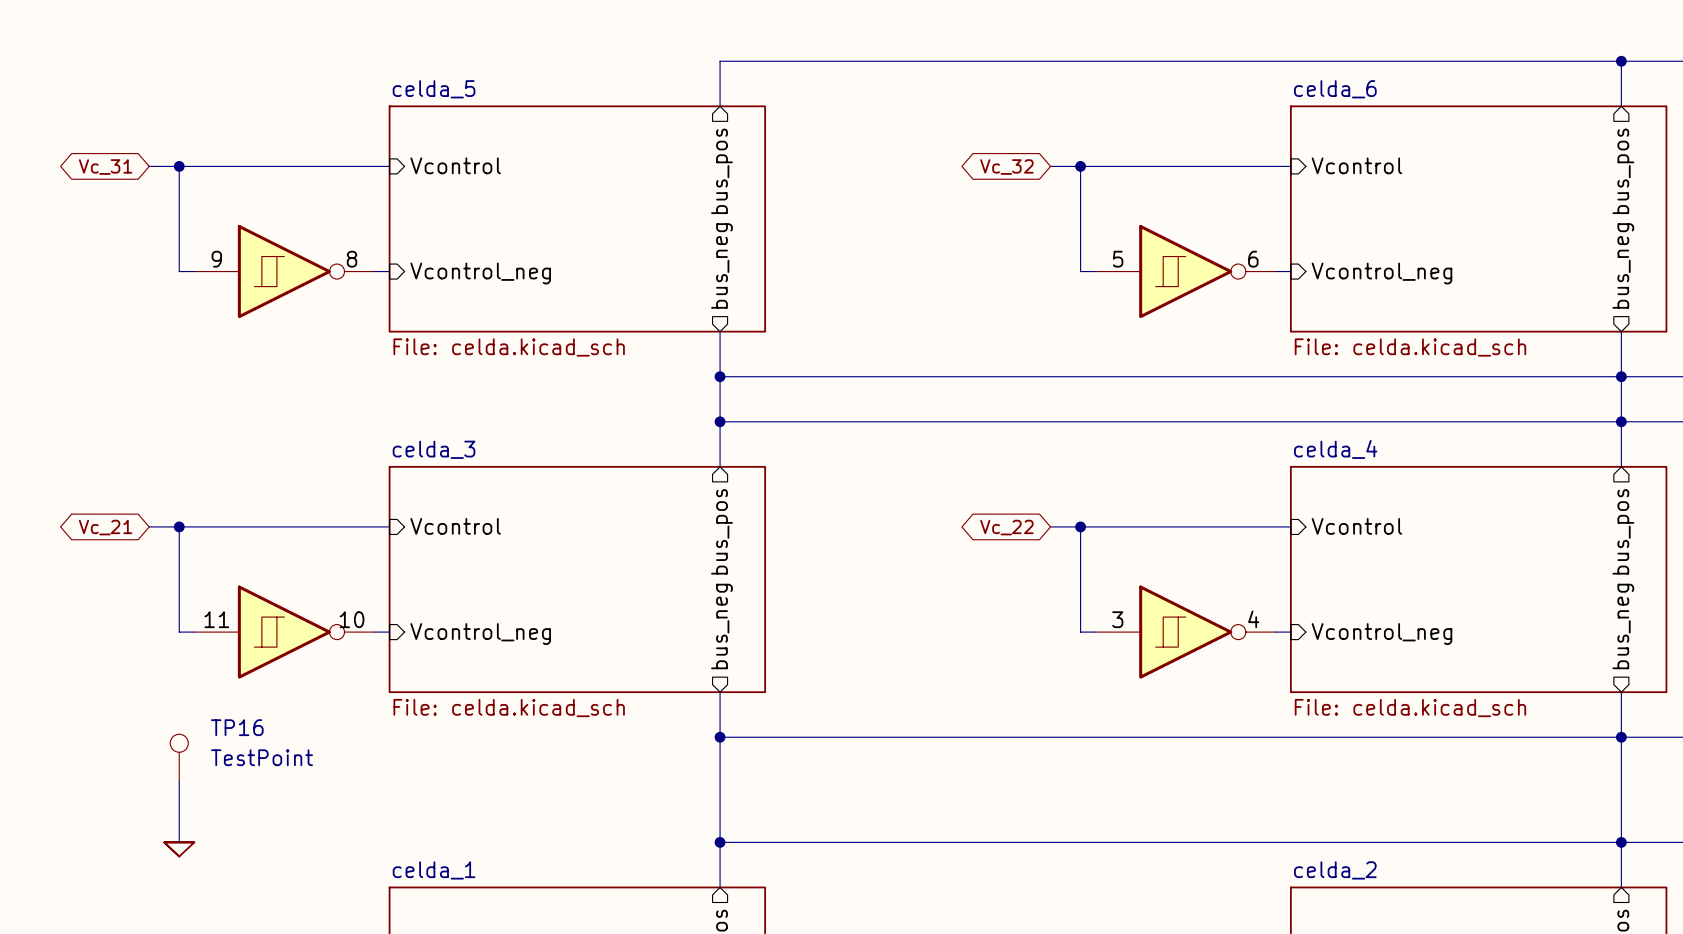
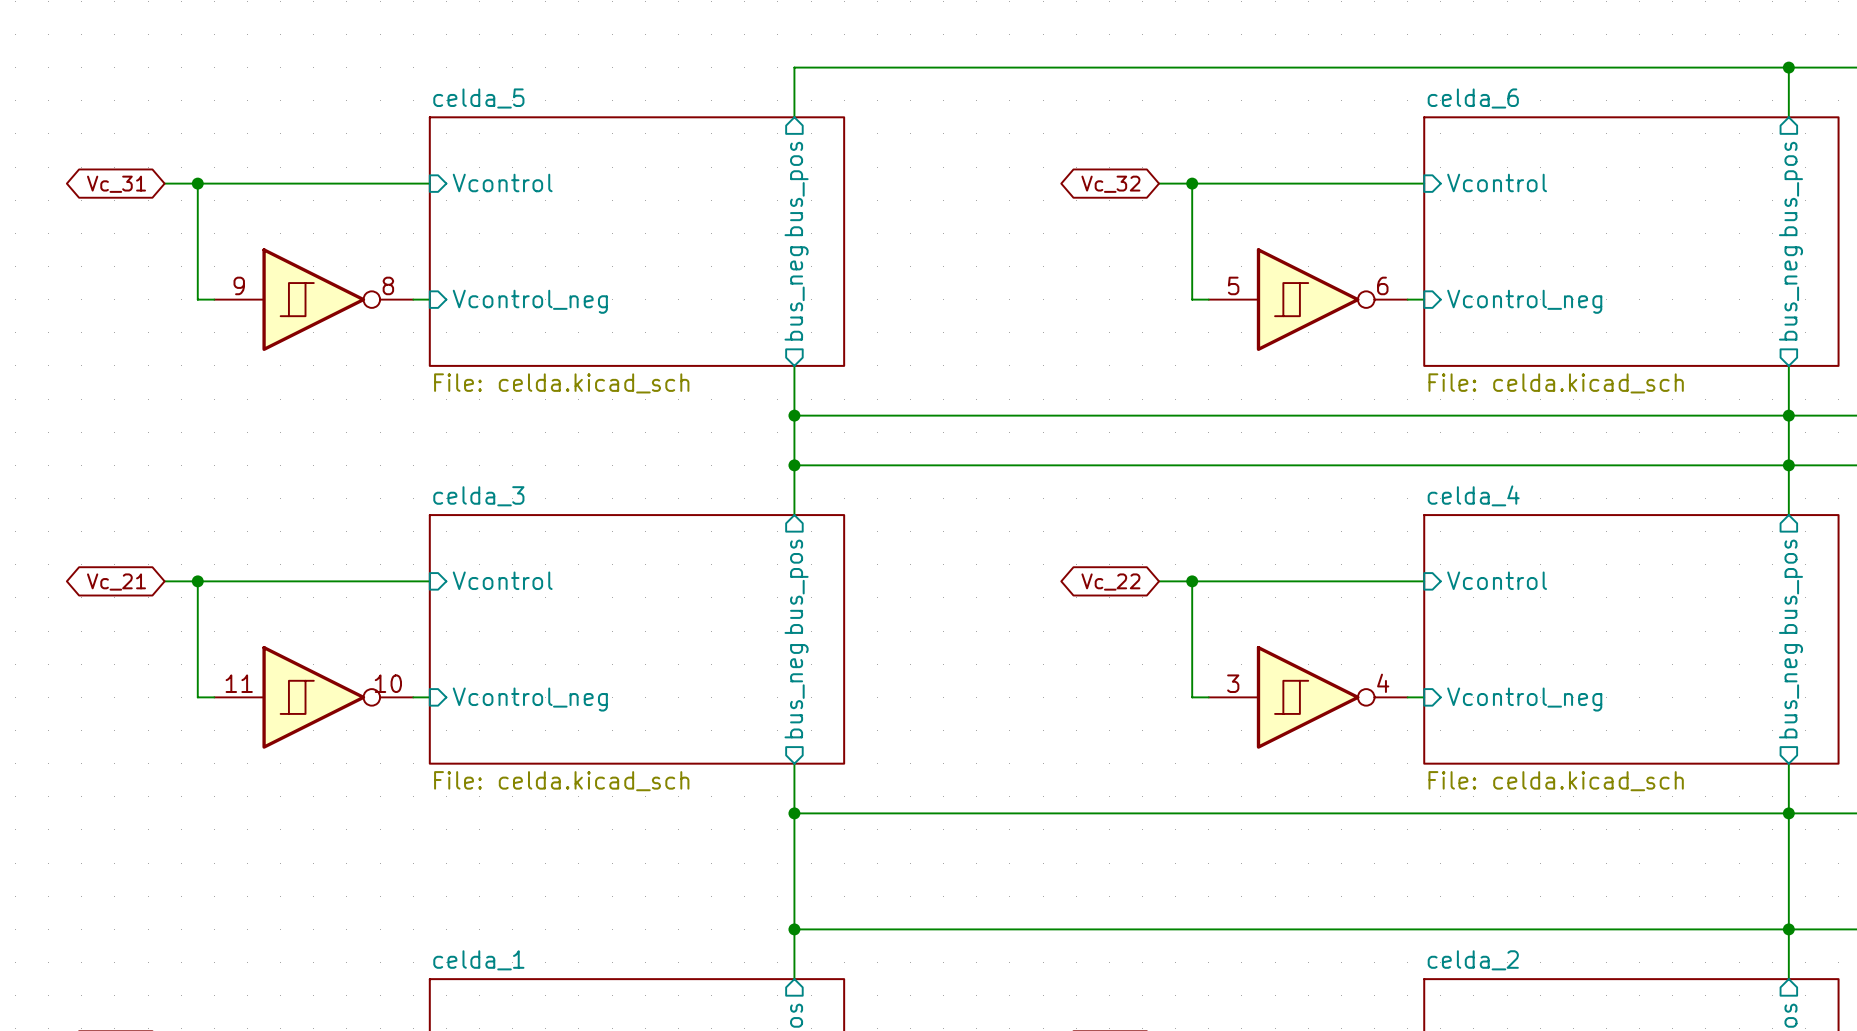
TP16: TestPoint (179, 758) -> none
wire: (179, 782) (179, 842) -> none
power symbol: (179, 849) -> none

